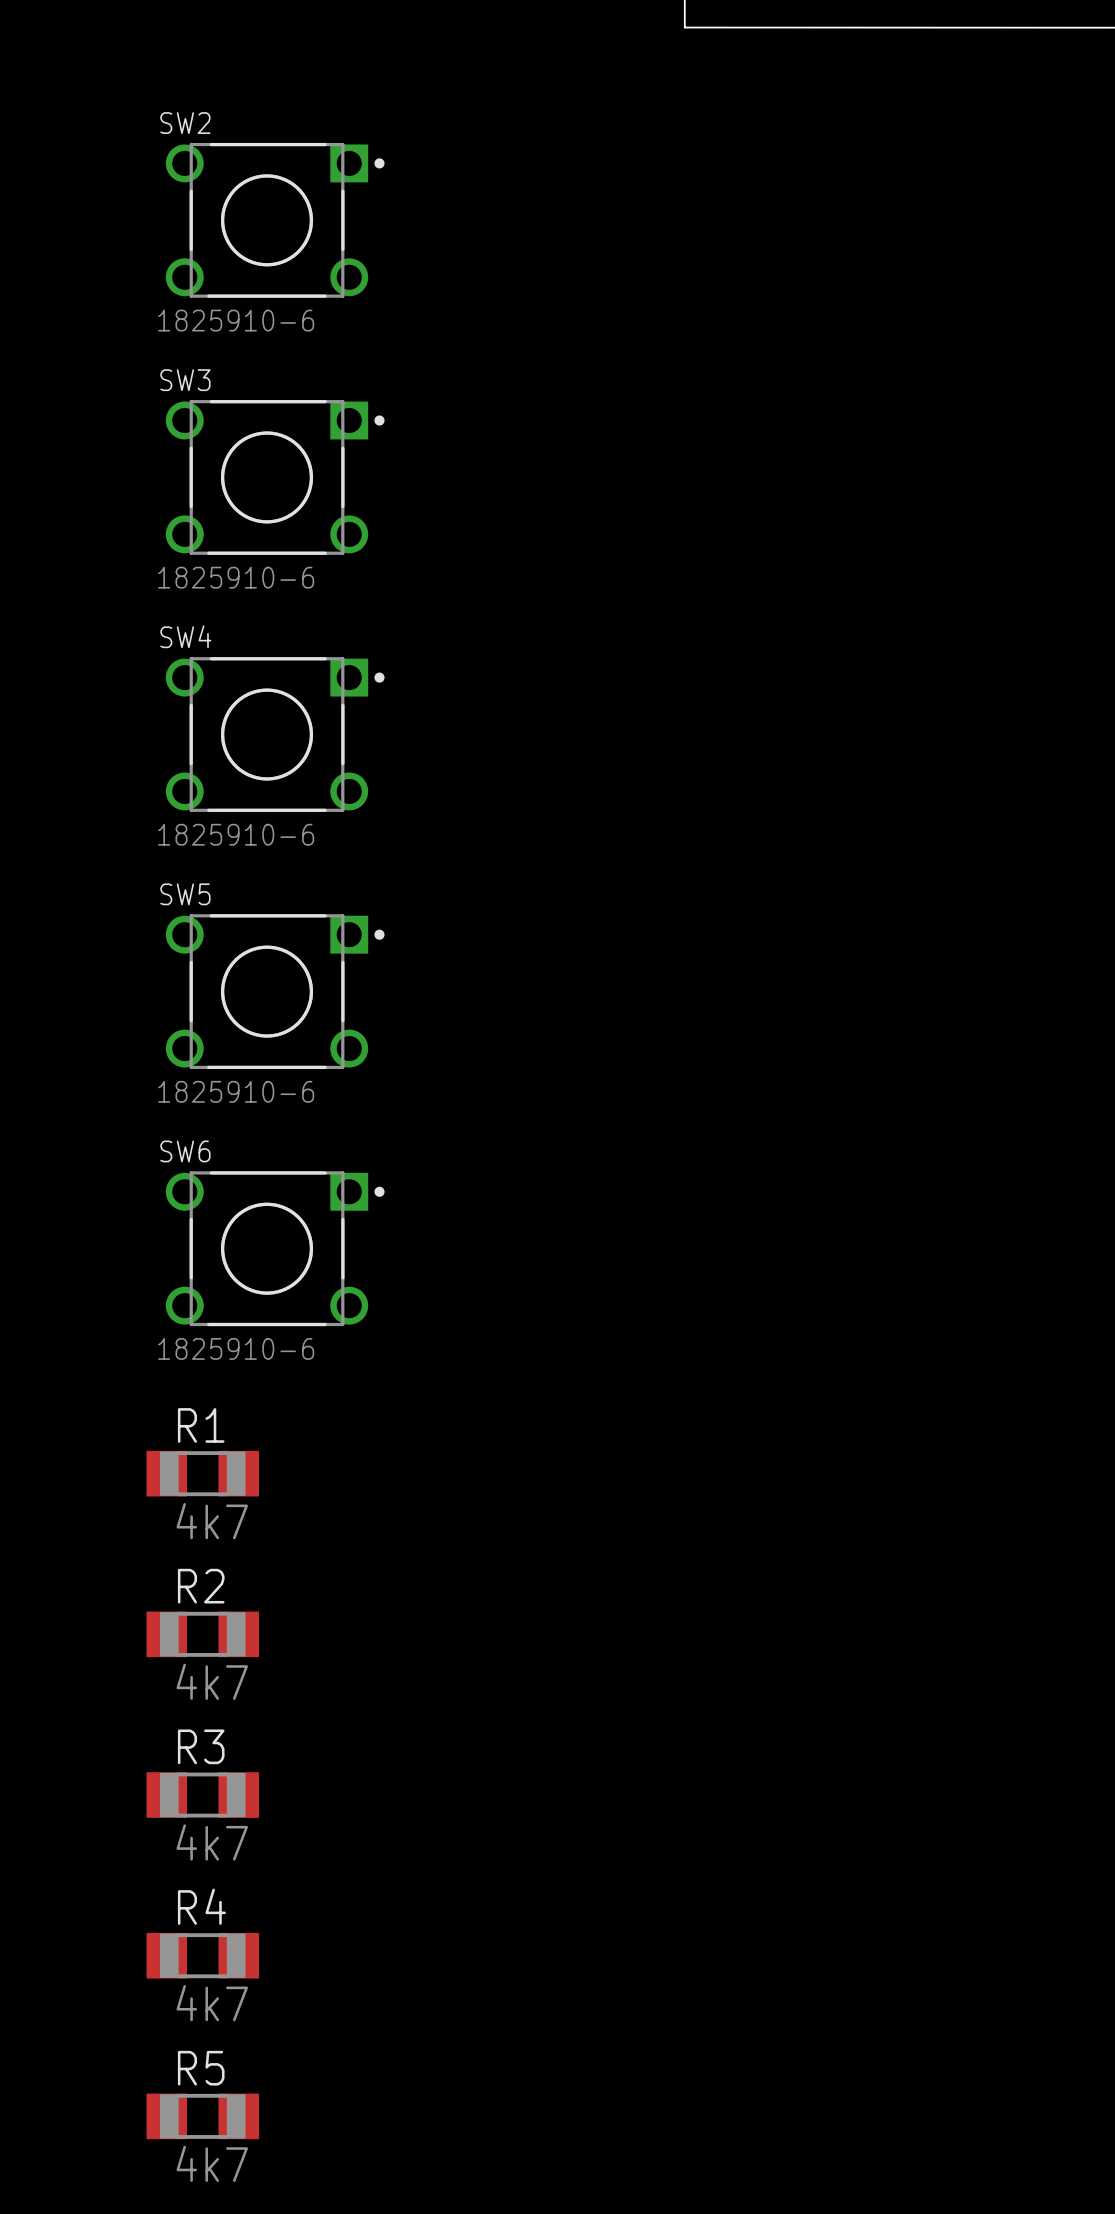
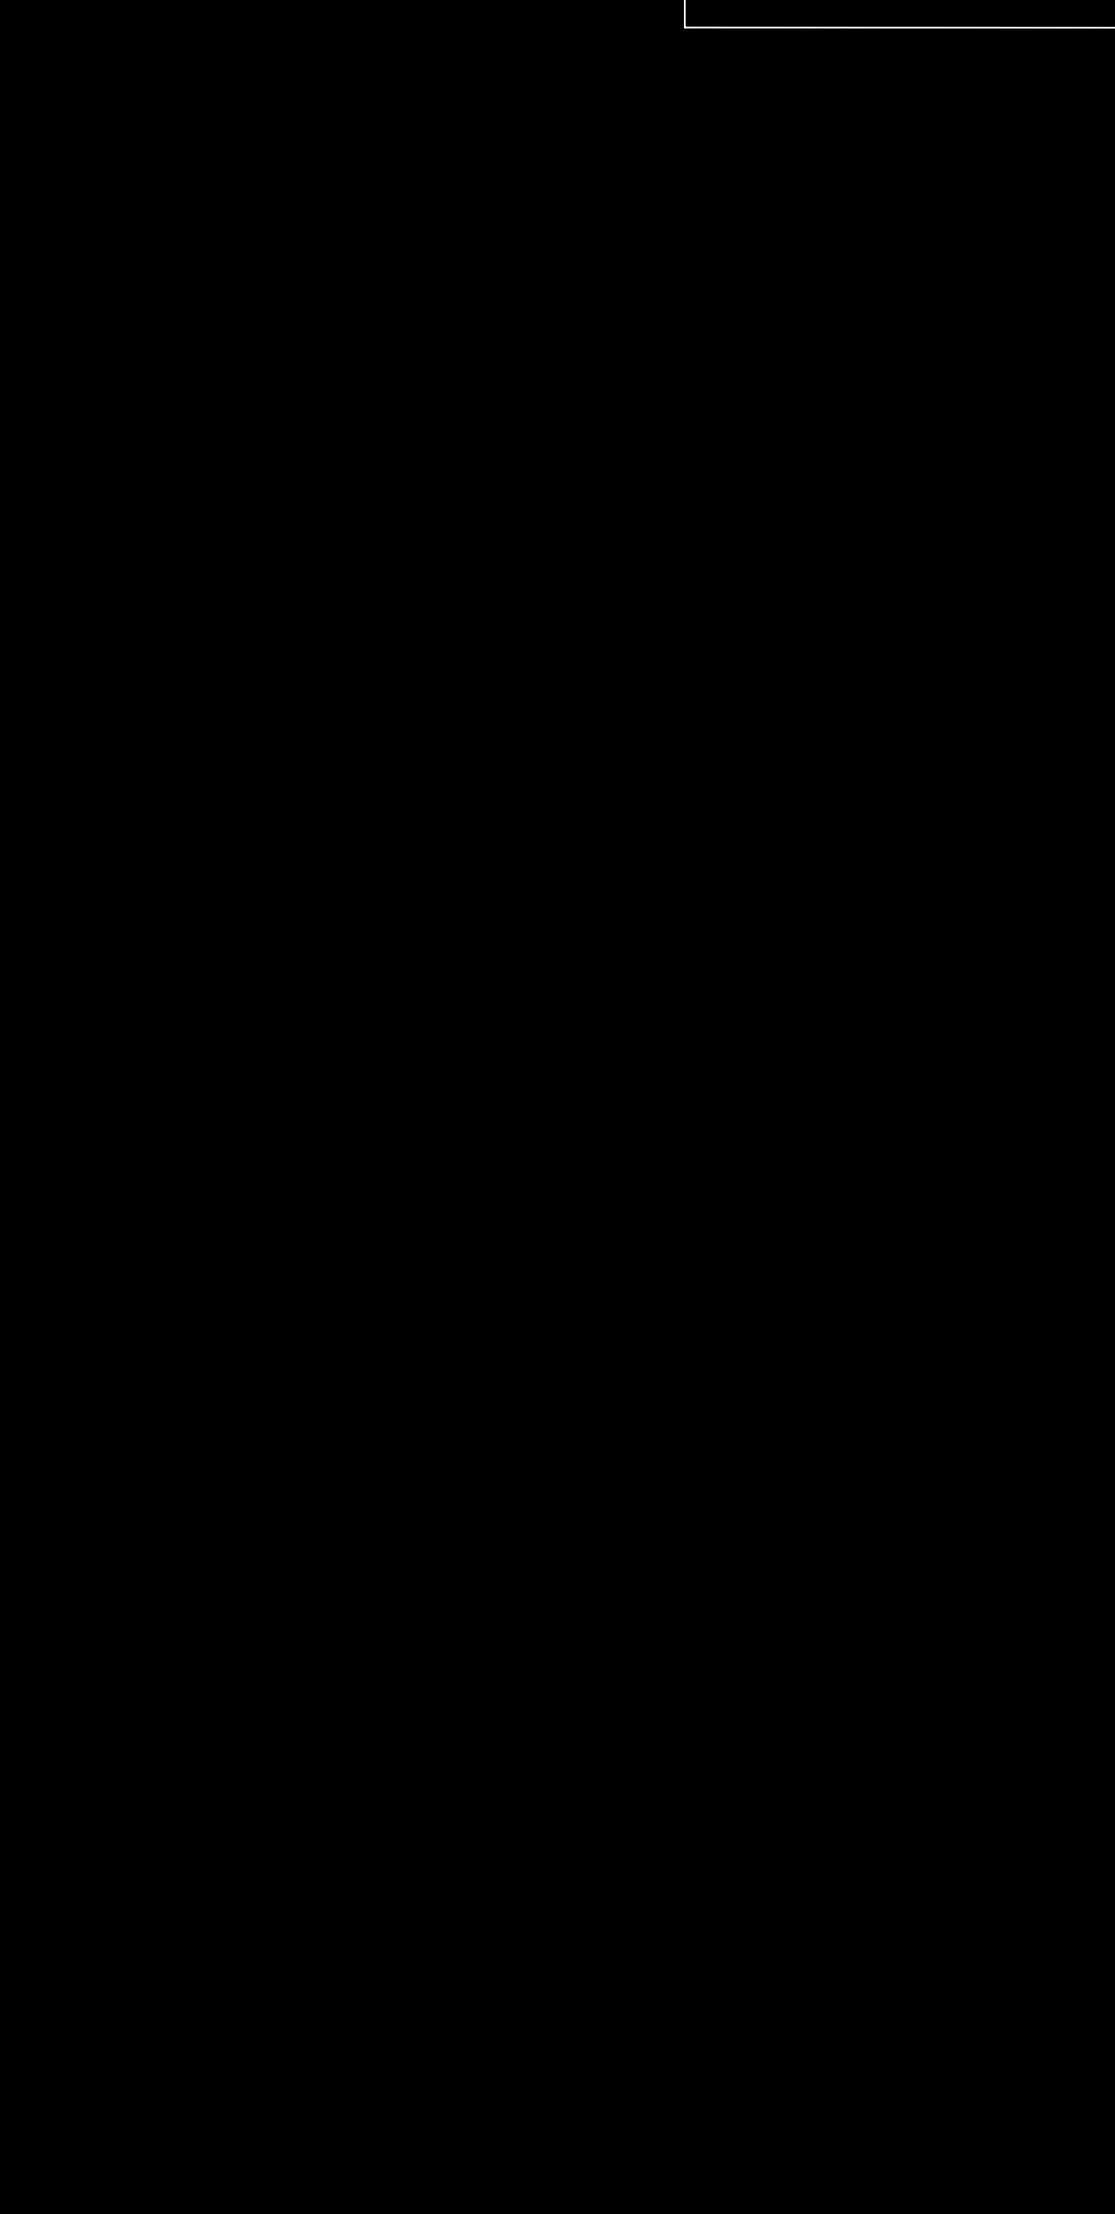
SW2: 1825910-6 (275, 220) -> none
SW3: 1825910-6 (275, 477) -> none
SW4: 1825910-6 (275, 734) -> none
SW5: 1825910-6 (275, 991) -> none
SW6: 1825910-6 (275, 1248) -> none
R1: 4k7 (202, 1473) -> none
R2: 4k7 (202, 1634) -> none
R3: 4k7 (202, 1795) -> none
R4: 4k7 (202, 1955) -> none
R5: 4k7 (202, 2116) -> none

